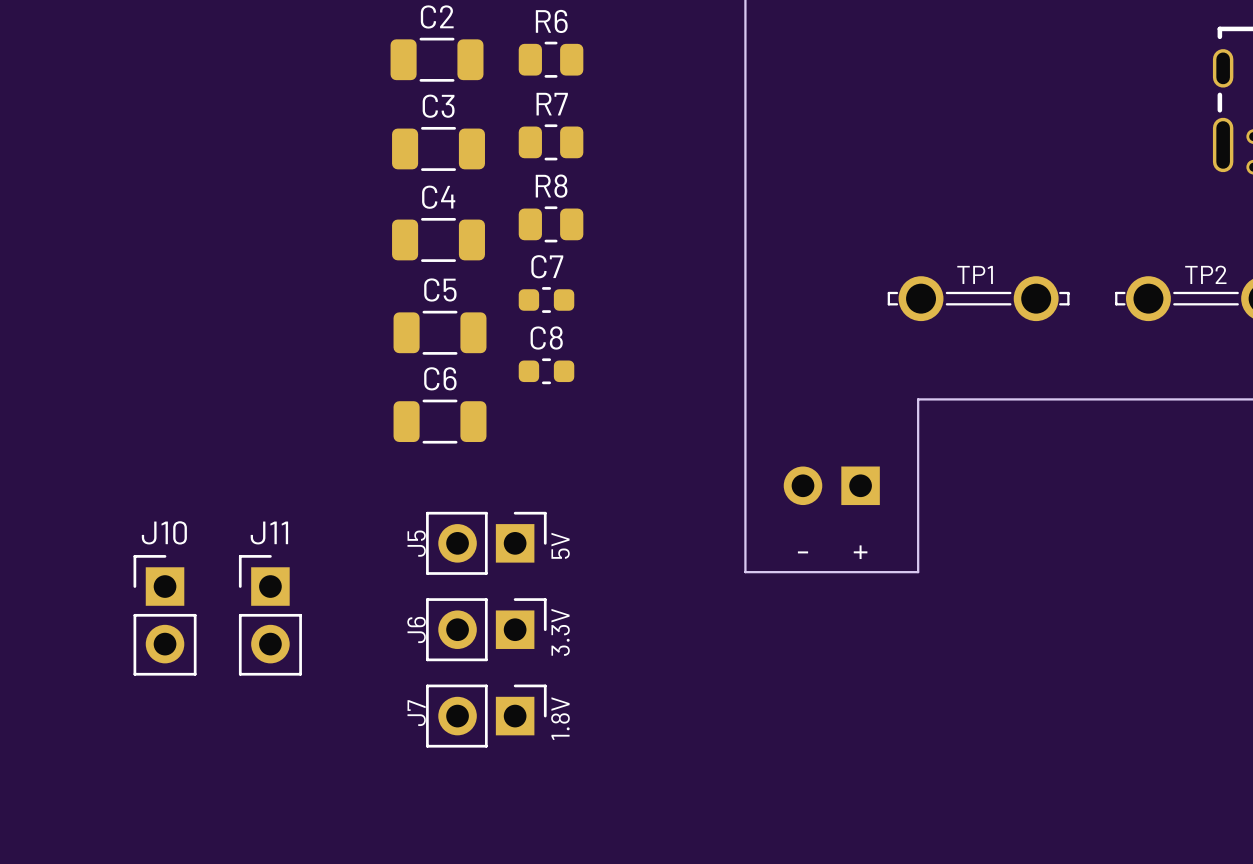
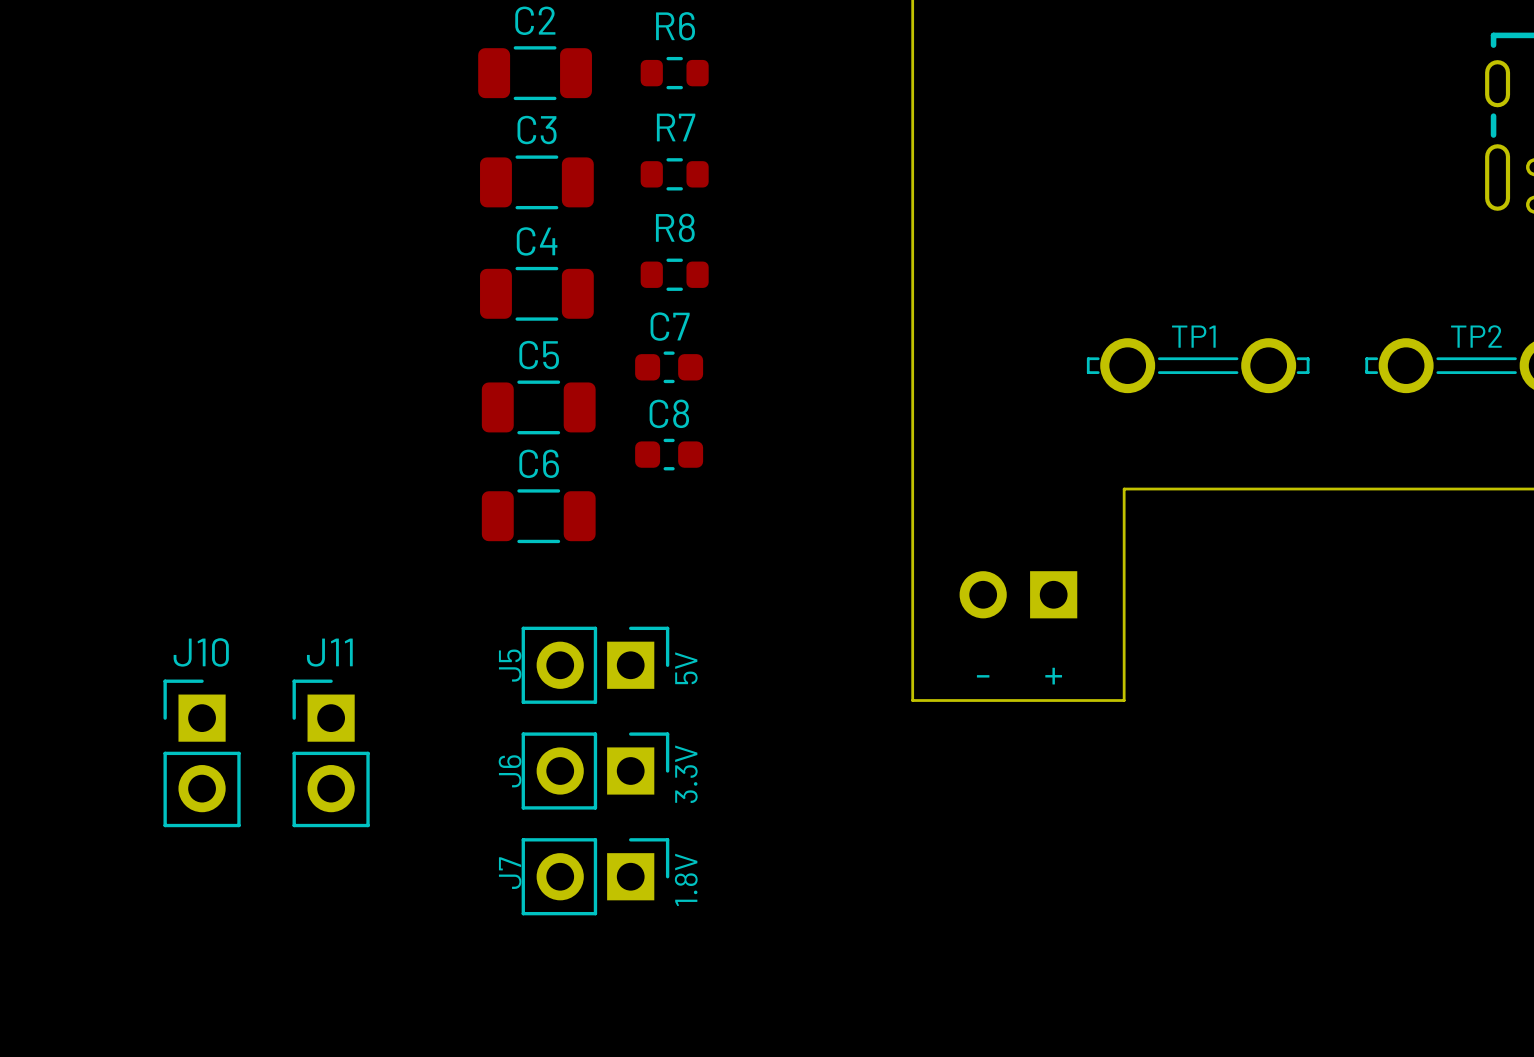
R6 footprint: [518, 41, 584, 78] -> [640, 56, 709, 90]
R7 footprint: [518, 124, 584, 161] -> [640, 158, 709, 191]
R8 footprint: [518, 206, 584, 243] -> [640, 258, 709, 291]

